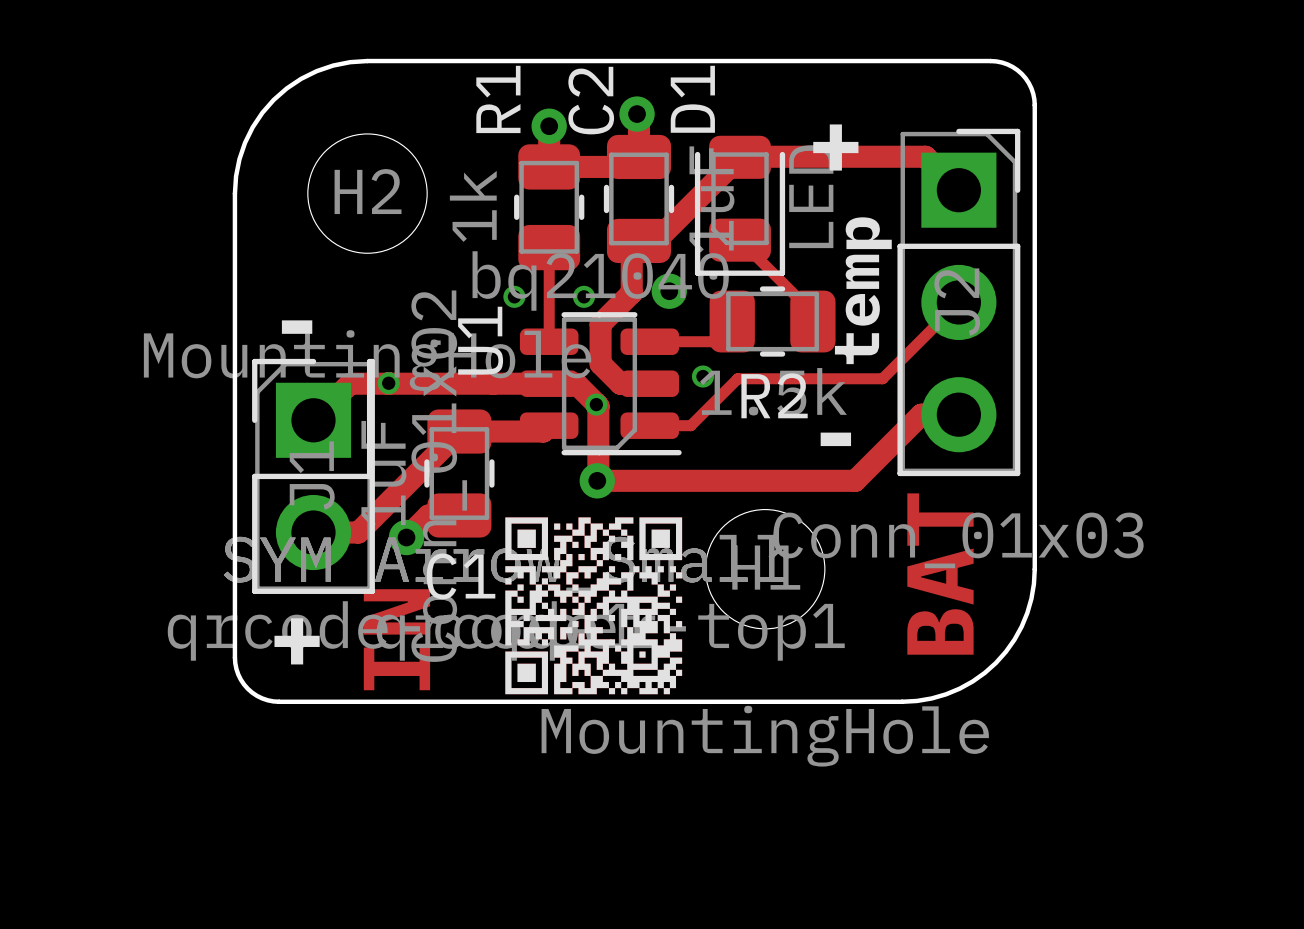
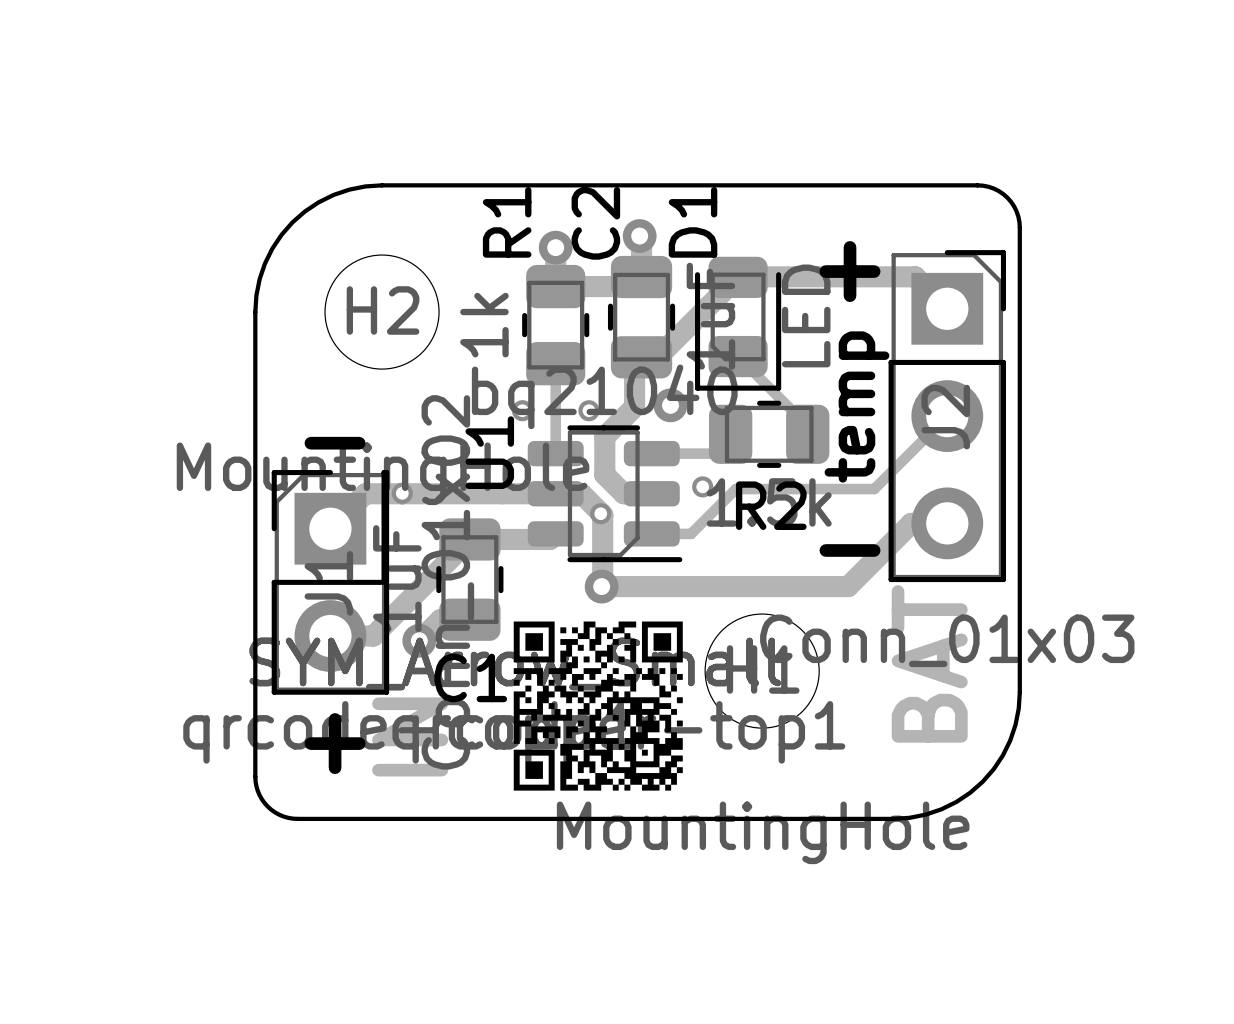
board edge: (1034, 569) (1031, 598) (1027, 613) (1014, 639) (1005, 651) (984, 672) (959, 688) (931, 698) (917, 700) (279, 701) (262, 698) (247, 688) (238, 674) (234, 657) -> (1019, 671) (1018, 708) (1015, 724) (1002, 755) (993, 769) (970, 792) (956, 801) (925, 814) (909, 817) (292, 818) (275, 812) (261, 799) (255, 781) (255, 755)

